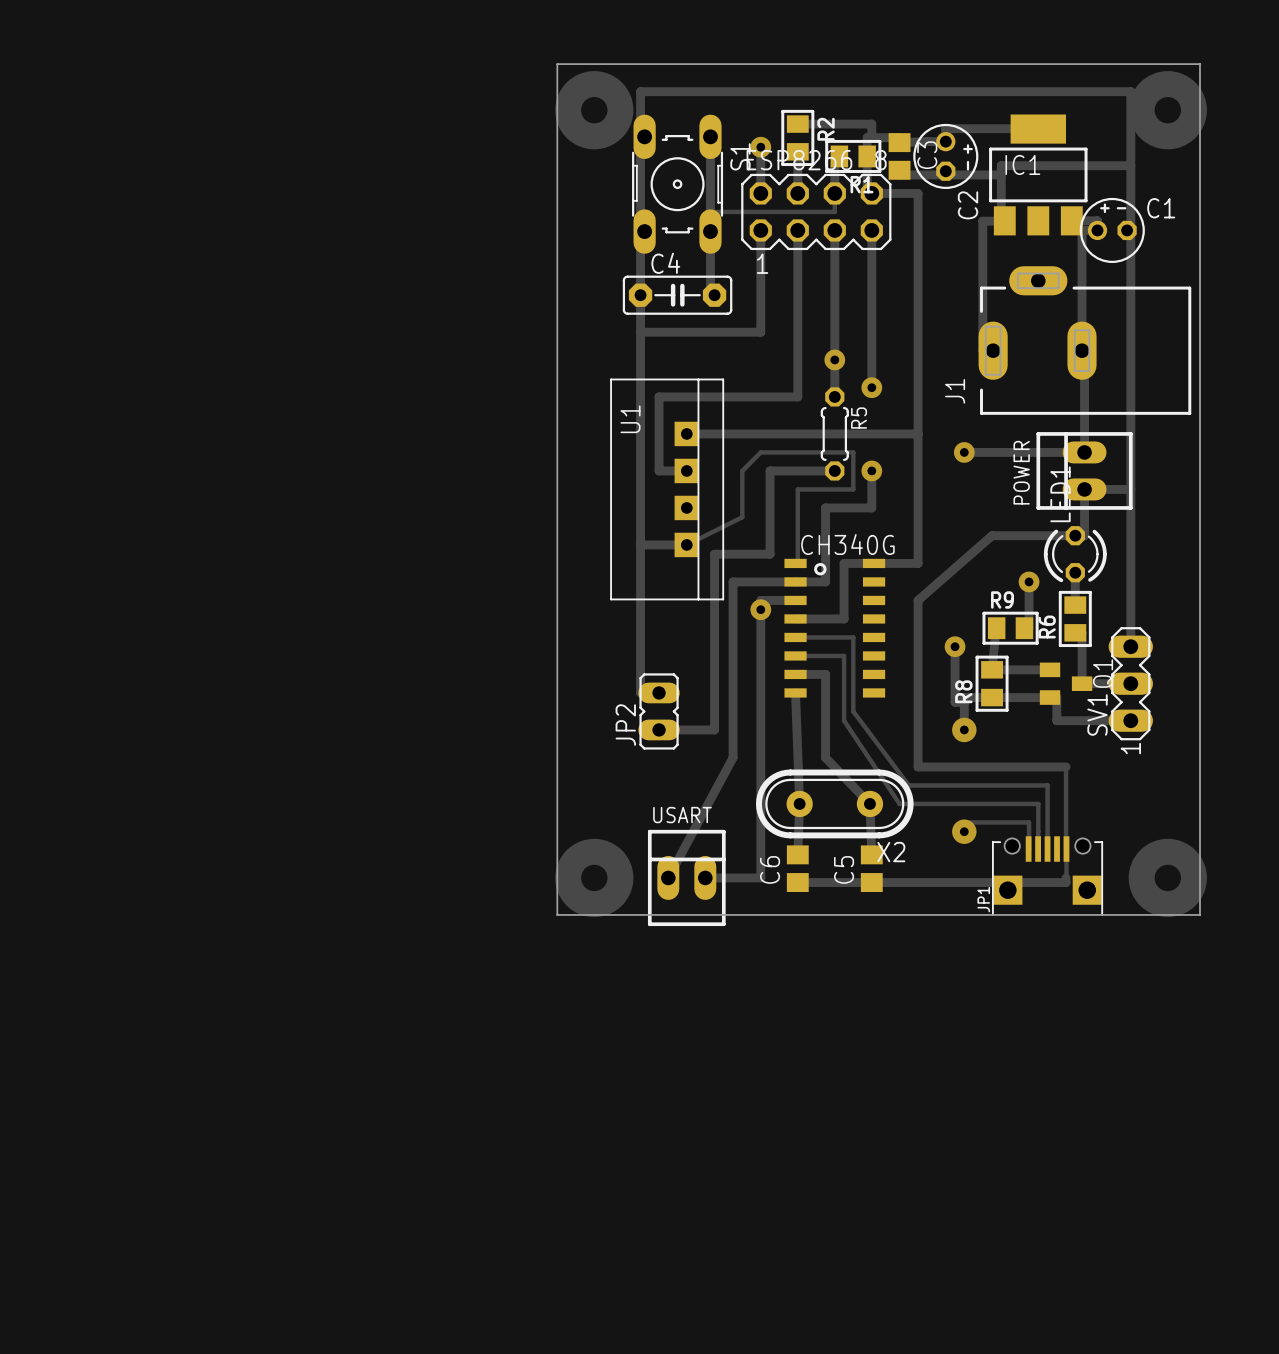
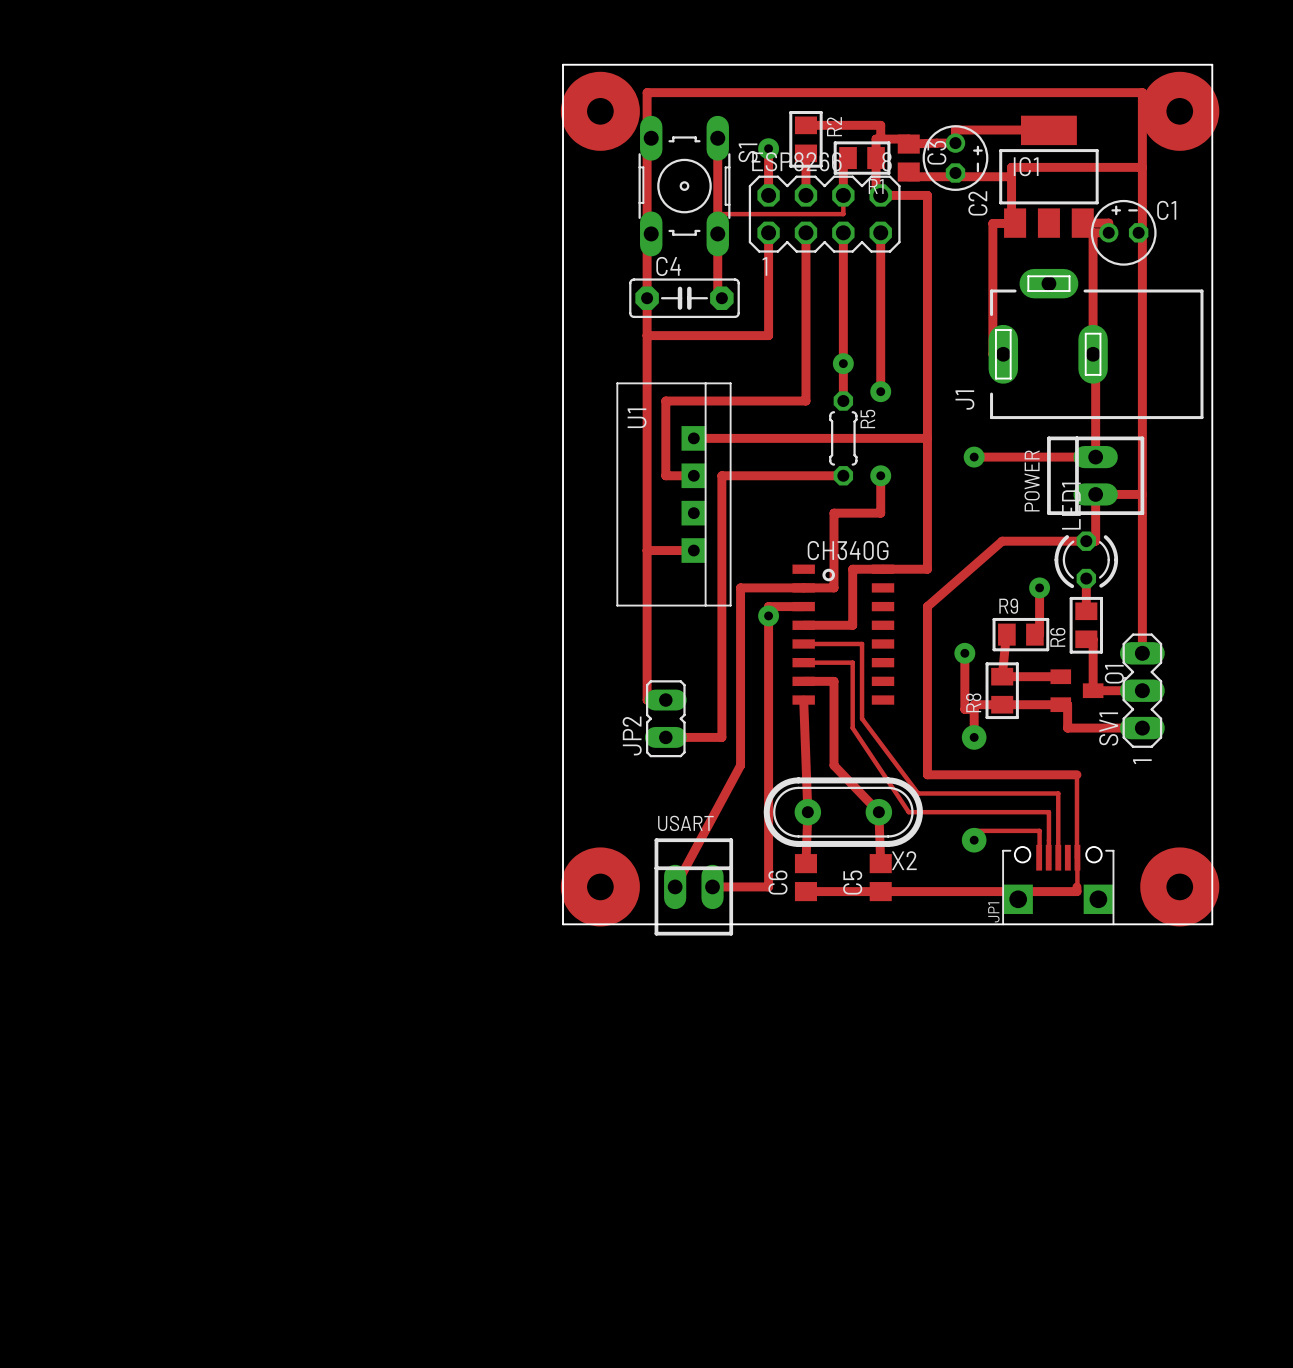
track: (770, 470) (770, 554) (714, 554) -> (777, 475) (721, 475) (721, 559)
track: (686, 544) (742, 517) (742, 470) (760, 452) (853, 452) (853, 489) (797, 489) (797, 563) (795, 563) -> none

